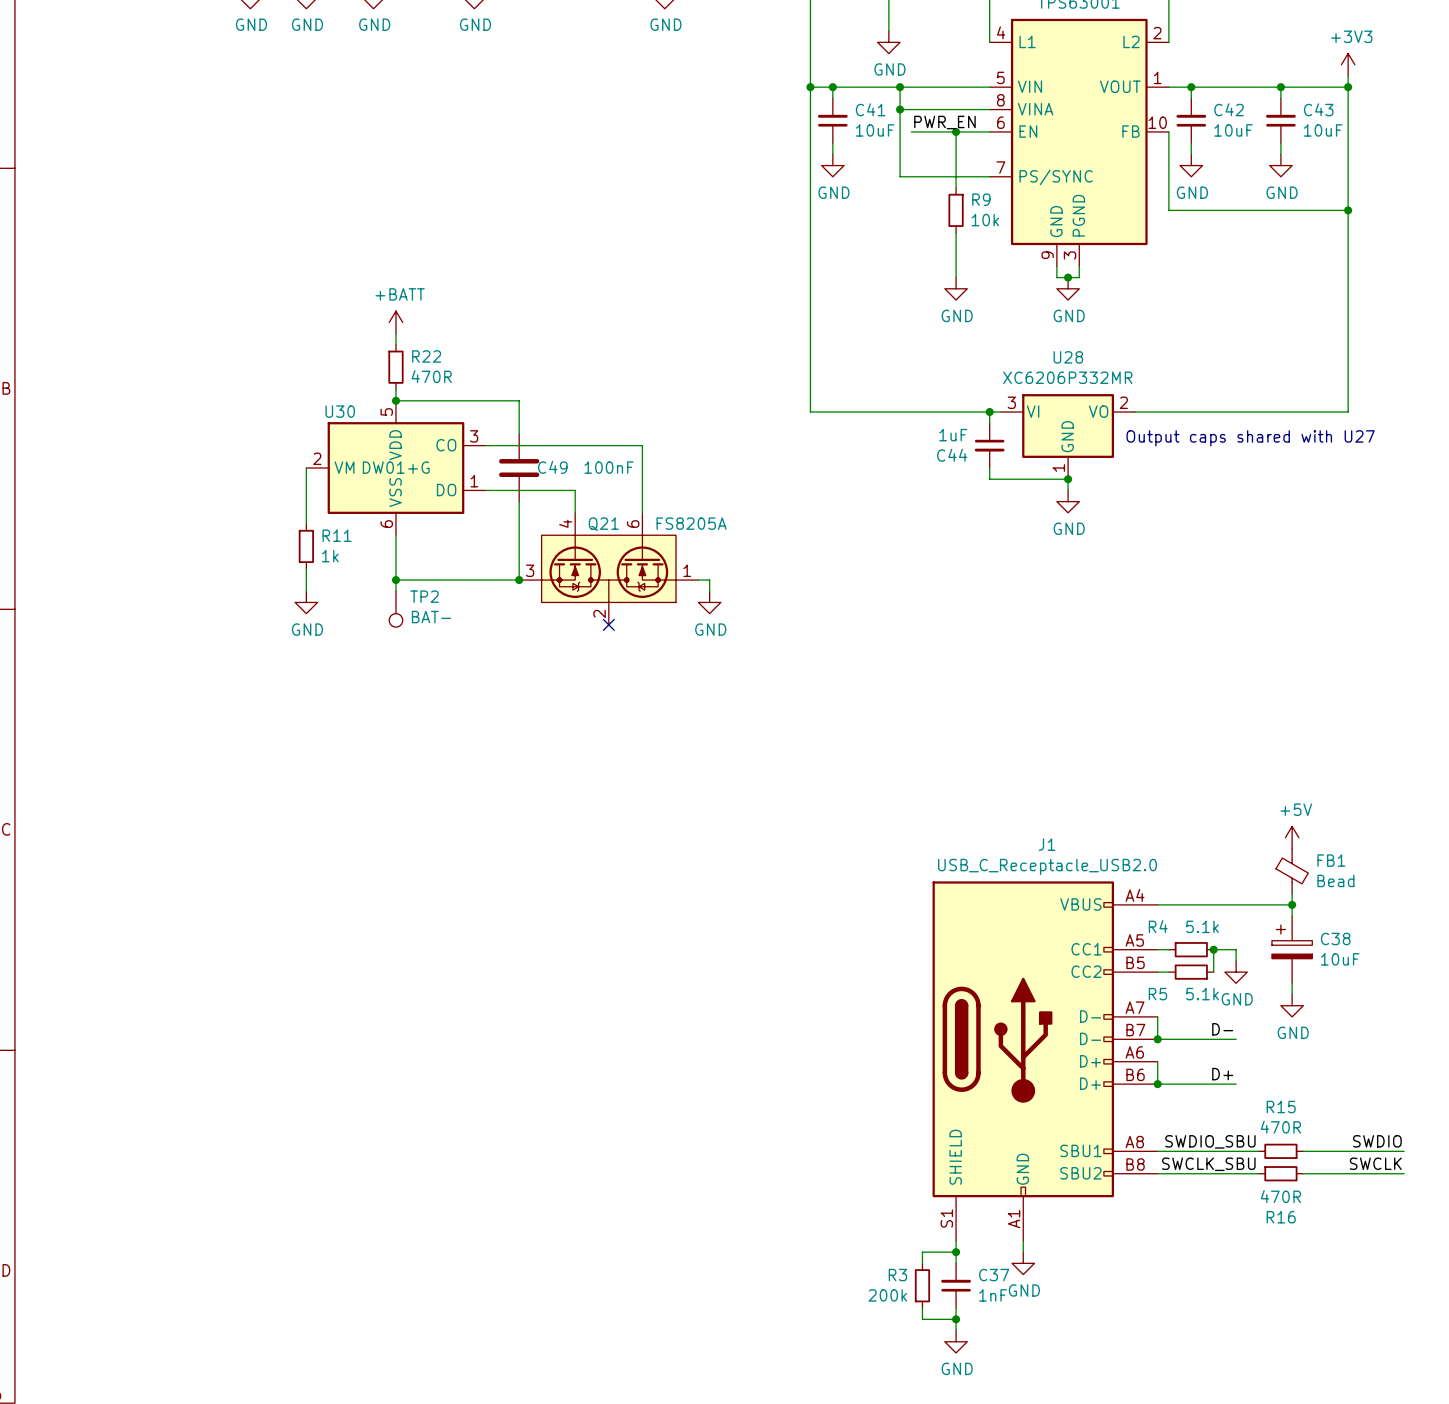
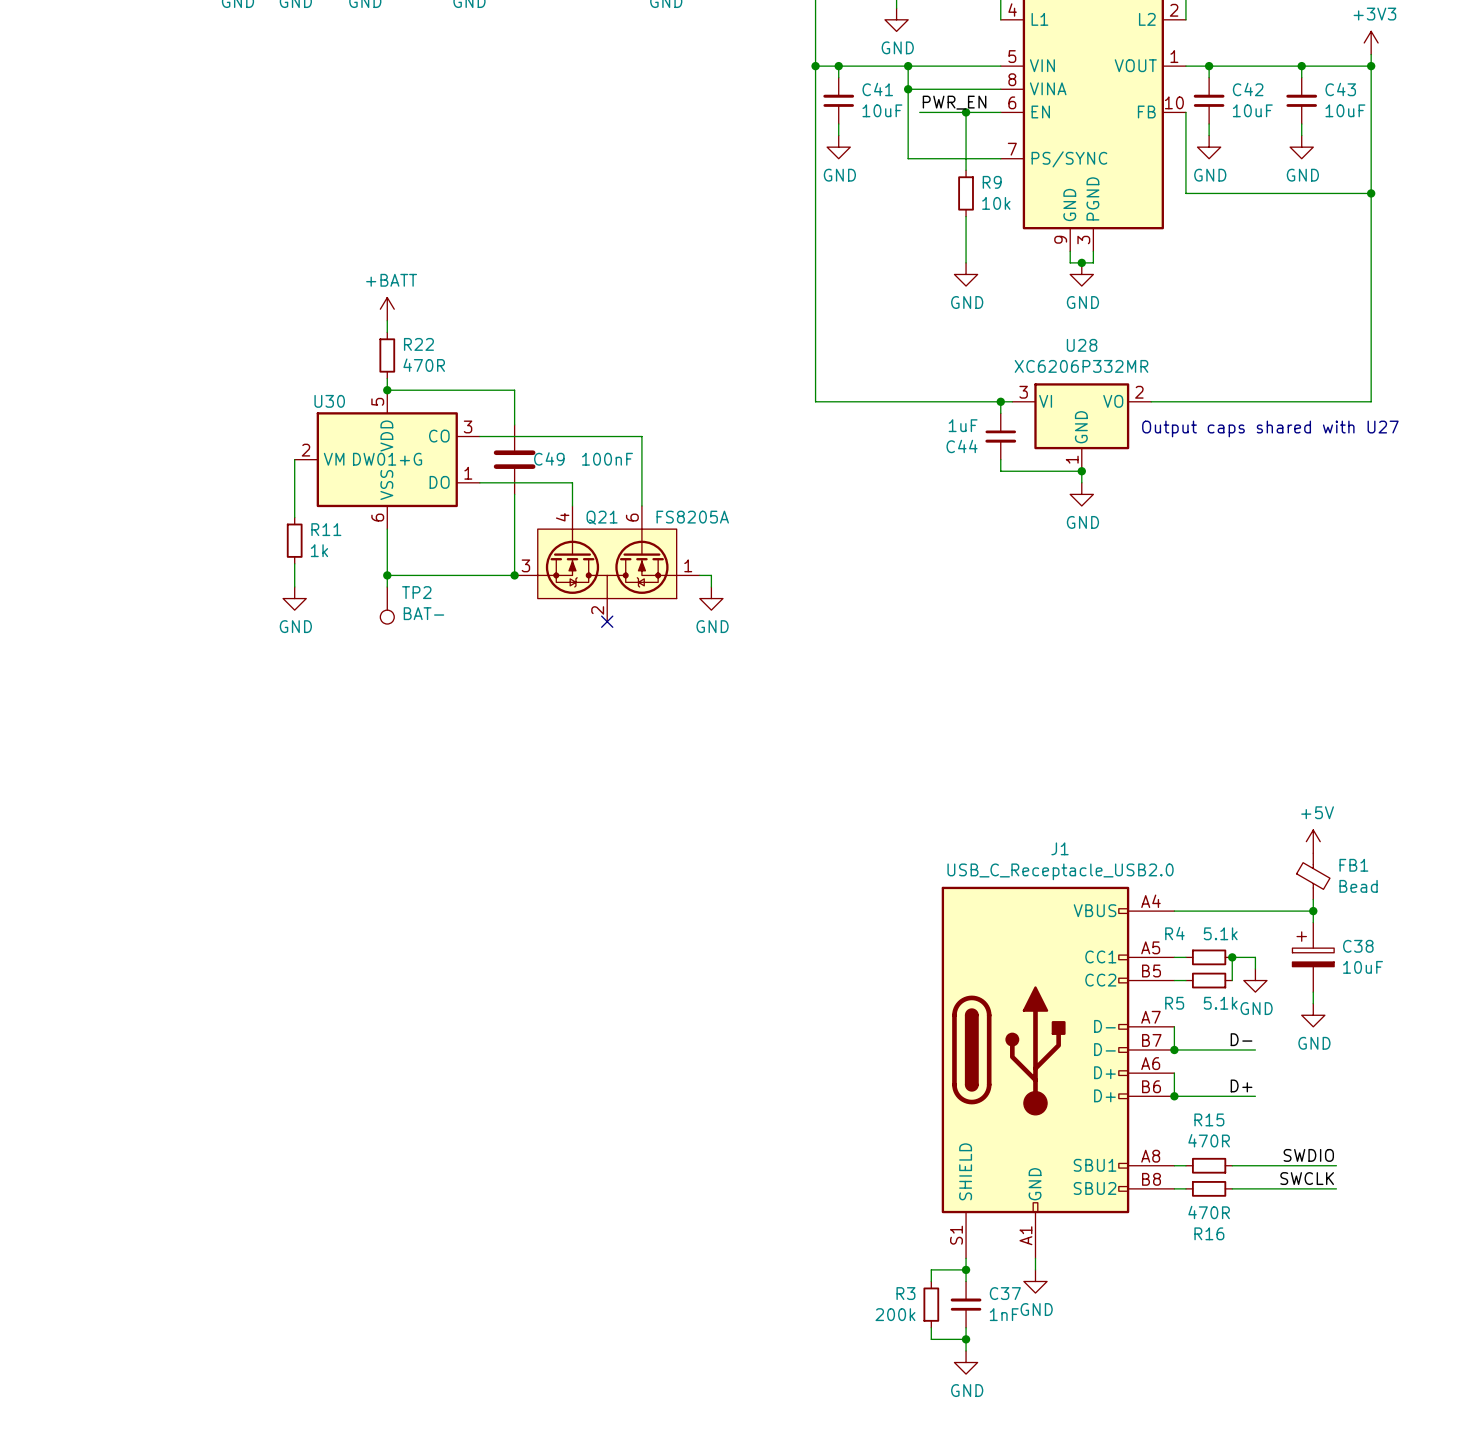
label: SWDIO_SBU (1210, 1141) -> none
label position: SWDIO (1377, 1141) -> SWDIO (1308, 1155)
wire: (1168, 1151) (1213, 1151) -> (1278, 1165) (1324, 1165)
R15 position: (1280, 1151) -> (1209, 1165)
wire: (1314, 1151) (1404, 1151) -> none
label position: SWCLK (1375, 1163) -> SWCLK (1307, 1178)
label: SWCLK_SBU (1208, 1164) -> none
wire: (1168, 1173) (1213, 1173) -> (1278, 1188) (1324, 1188)
R16 position: (1280, 1173) -> (1209, 1188)
wire: (1314, 1173) (1404, 1173) -> none

